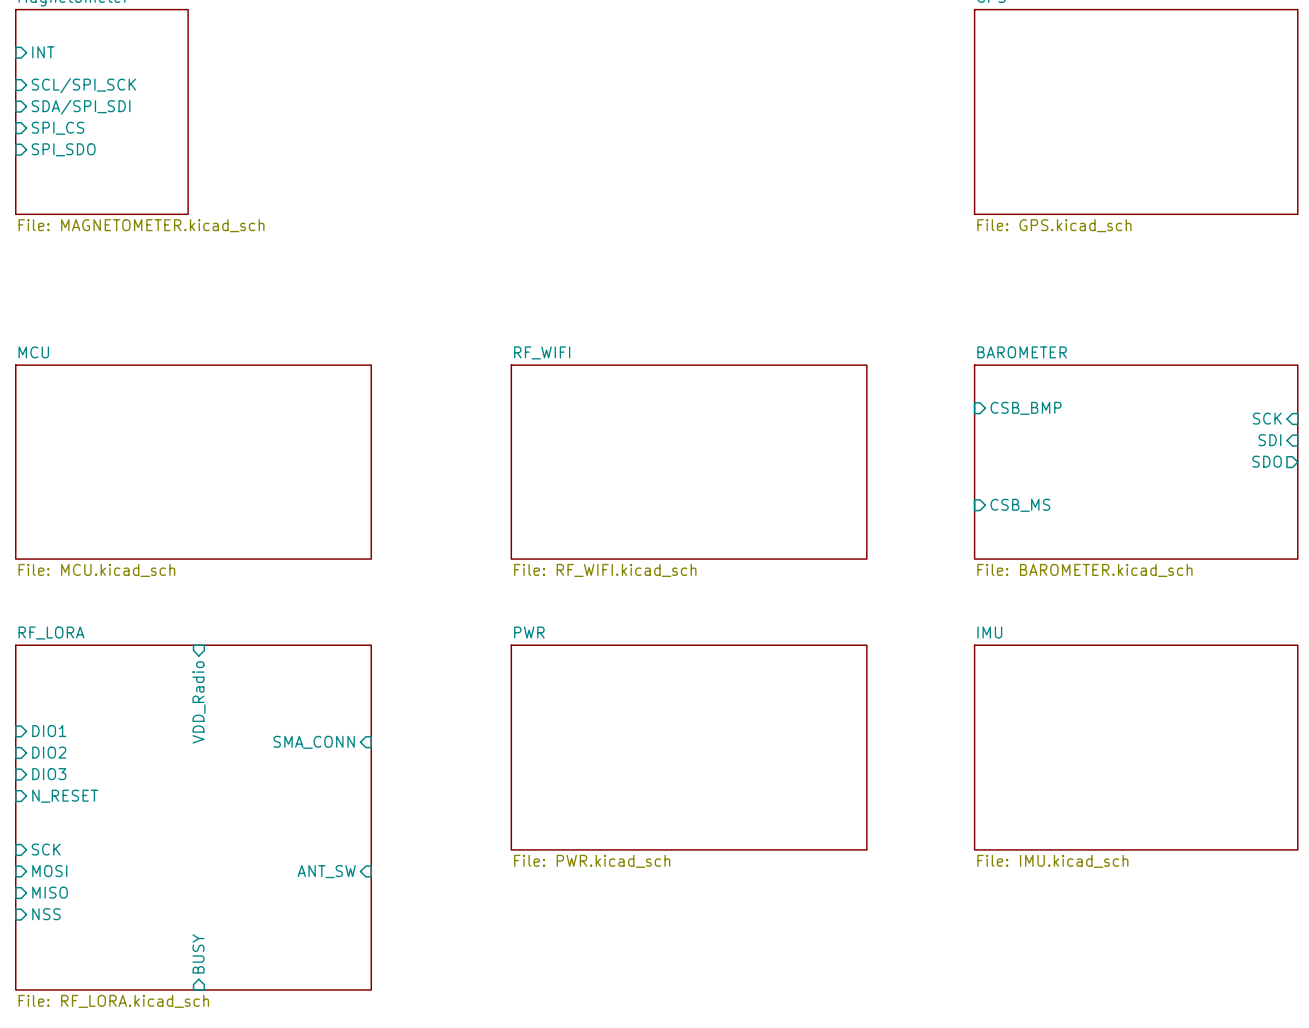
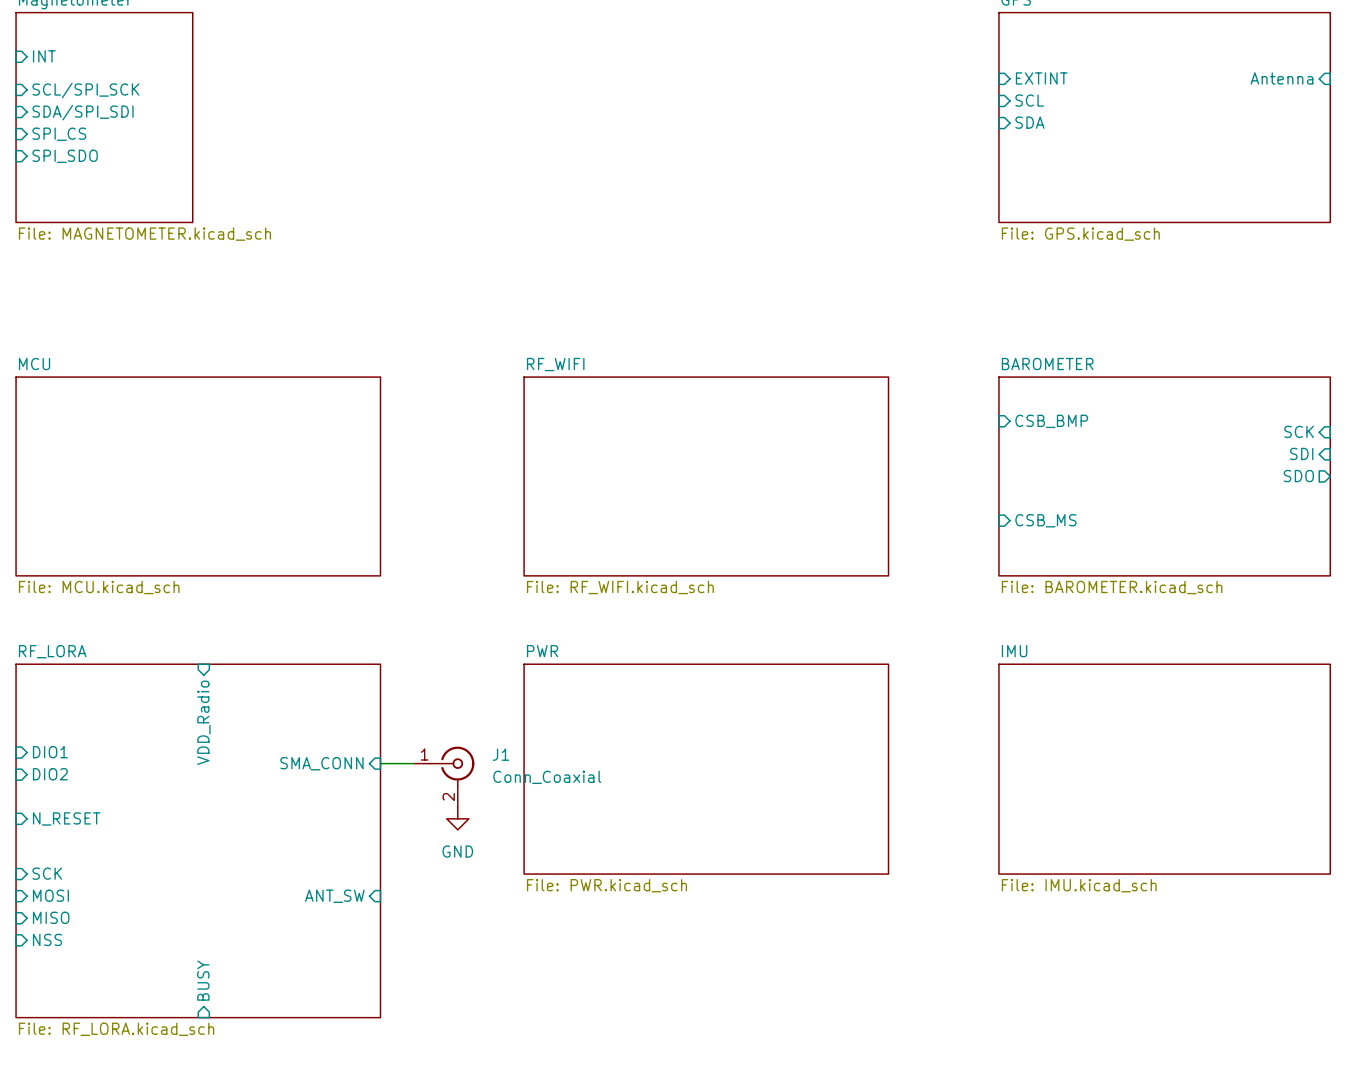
sheet pin: none -> EXTINT (1041, 78)
sheet pin: none -> Antenna (1281, 78)
sheet pin: none -> SCL (1029, 100)
sheet pin: none -> SDA (1029, 122)
wire: none -> (380, 763) (413, 763)
J1: none -> Conn_Coaxial (443, 777)
sheet pin: DIO3 (49, 774) -> none
power symbol: none -> GND (457, 818)

